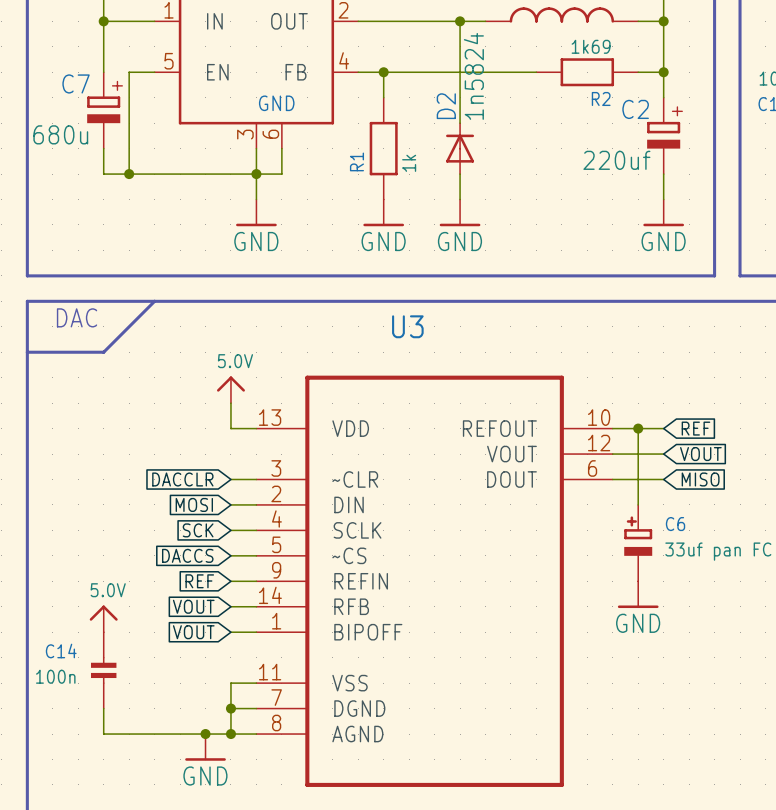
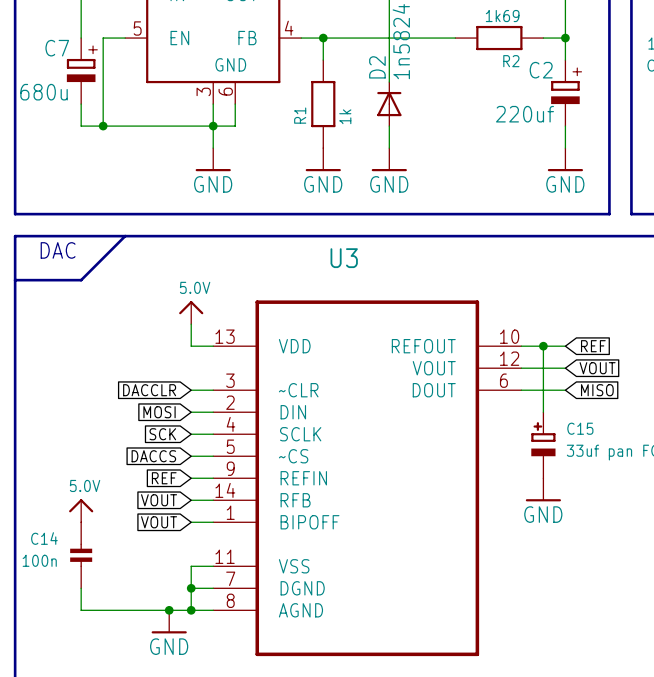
C6 name: C6 (675, 524) -> C15 (580, 428)

